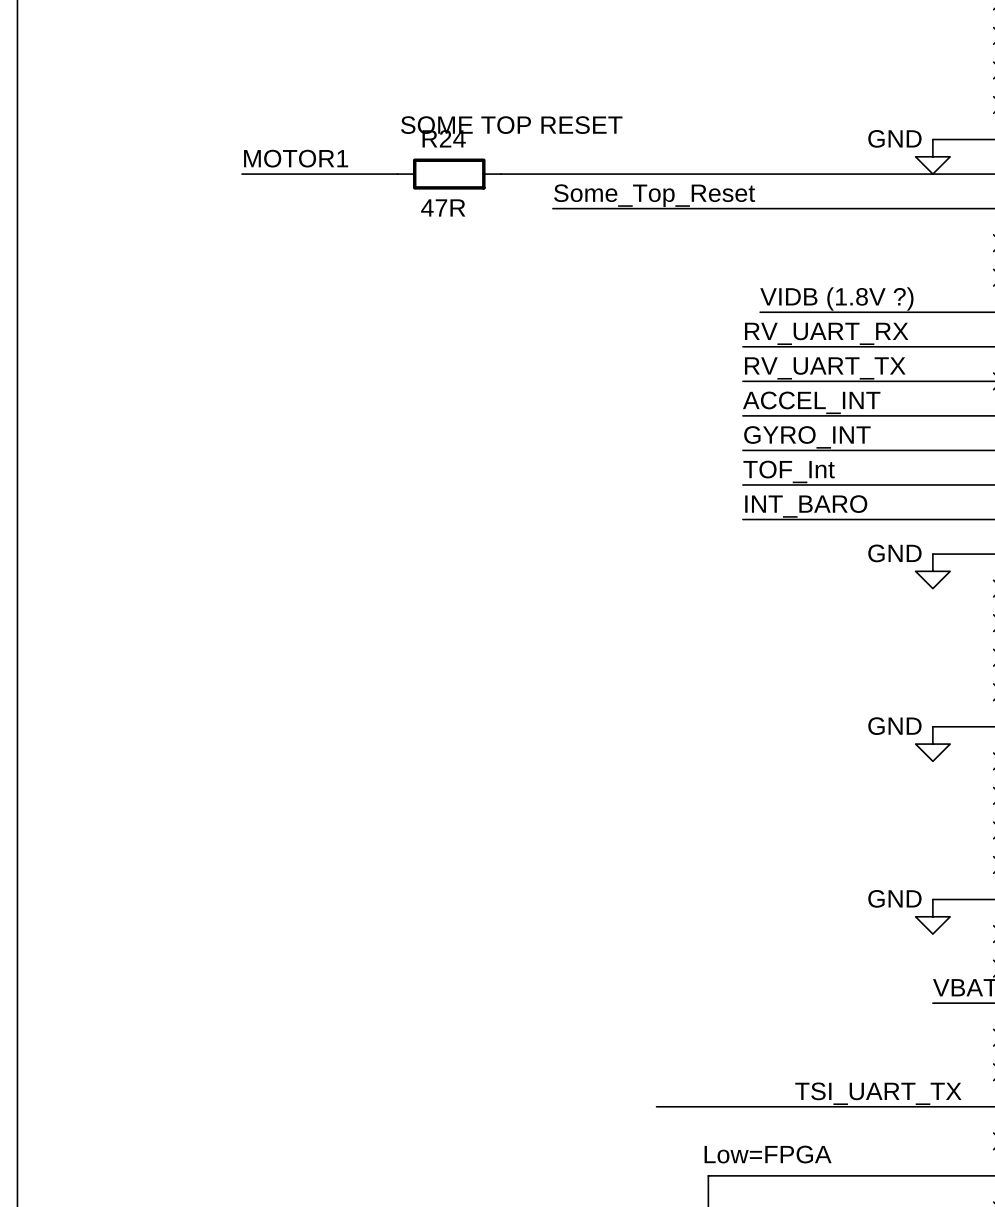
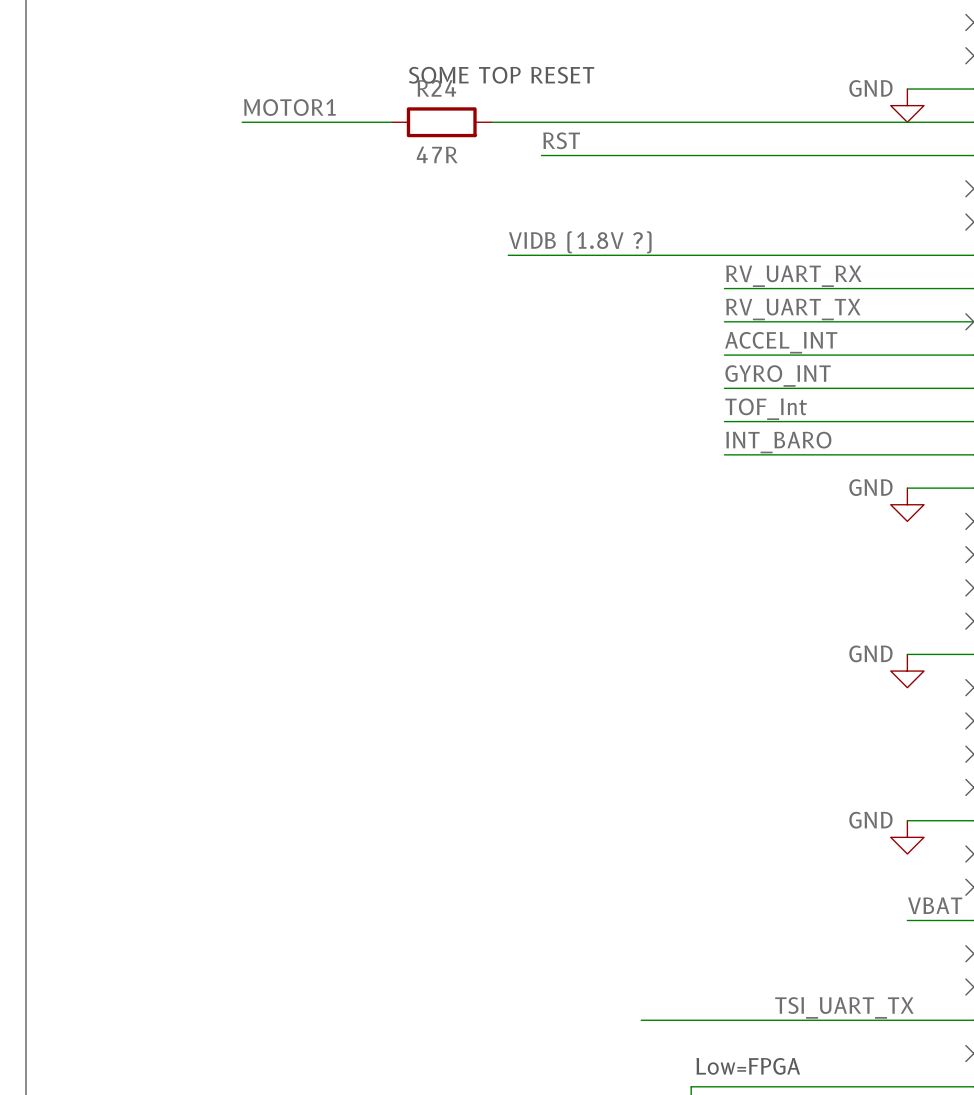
label: Some_Top_Reset (654, 195) -> RST (561, 140)
label position: VIDB (1.8V ?) (836, 298) -> VIDB (1.8V ?) (580, 242)
wire: none -> (508, 255) (741, 255)

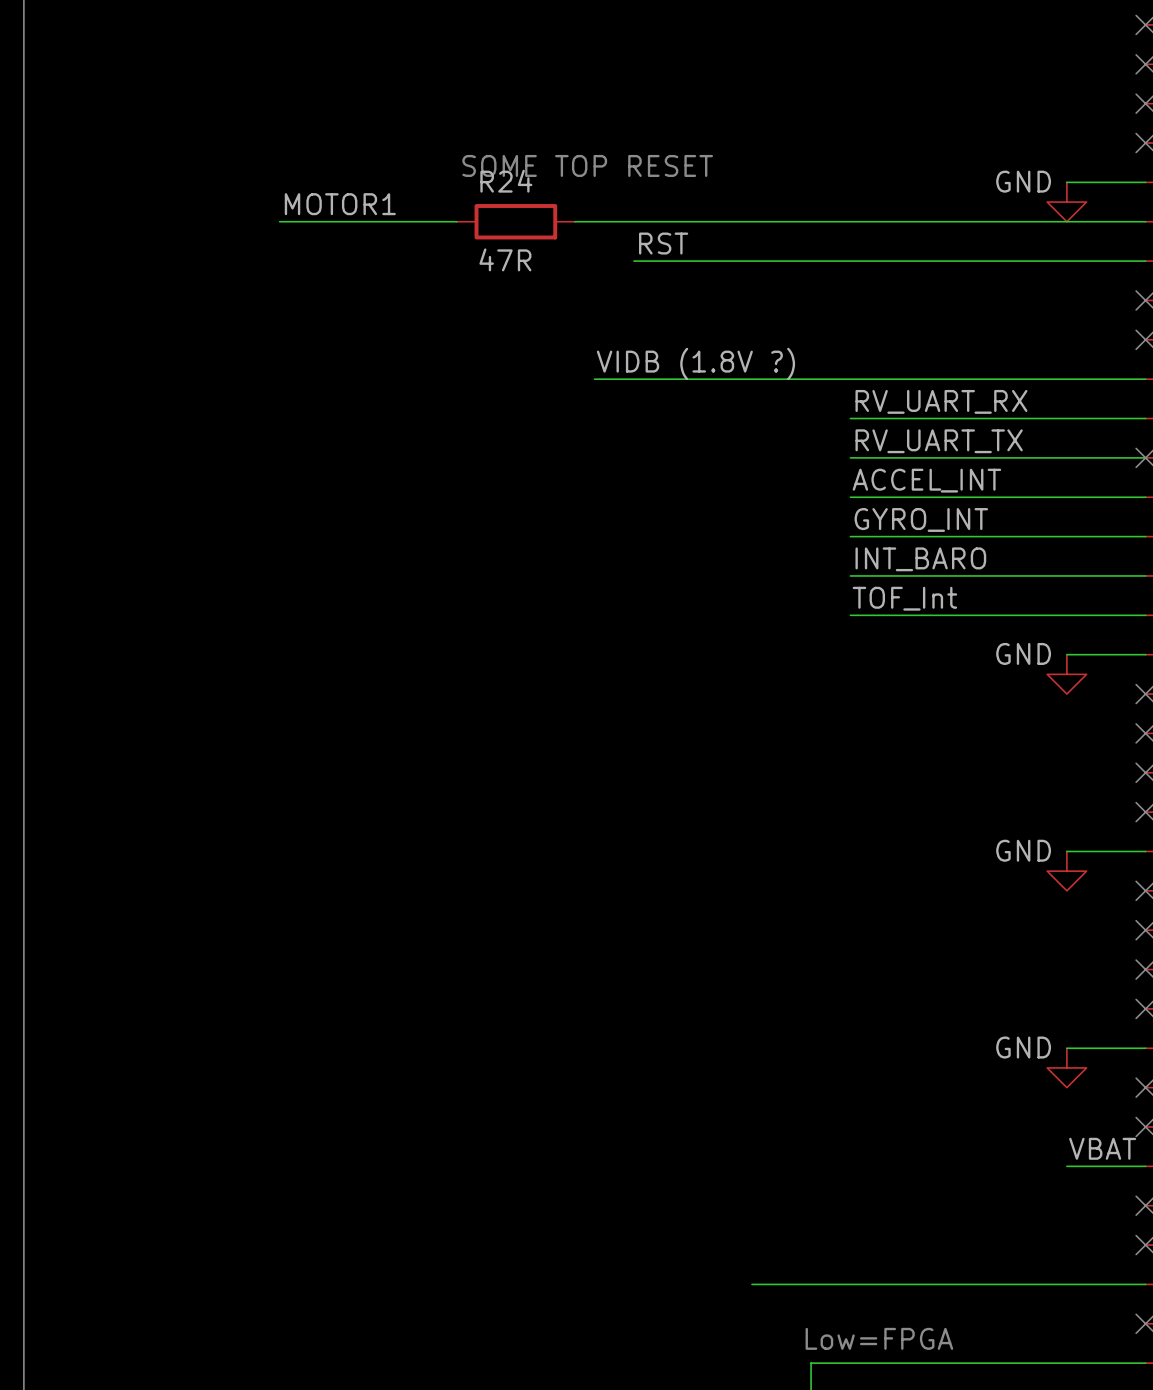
label: TOF_Int (766, 409) -> INT_BARO (920, 559)
label: INT_BARO (778, 442) -> TOF_Int (904, 598)
label: TSI_UART_TX (844, 1007) -> none

